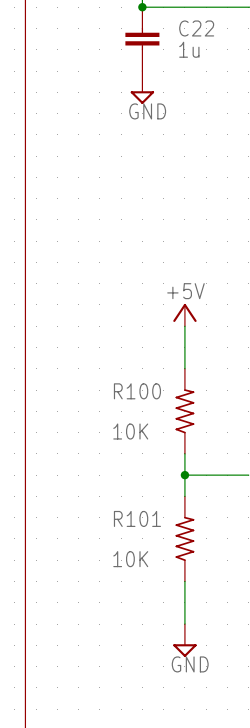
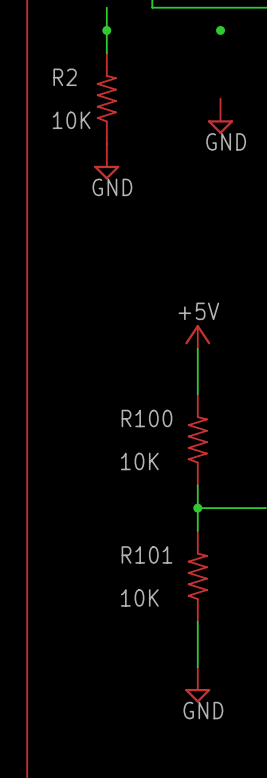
wire: none -> (106, 7) (106, 53)
junction: (142, 7) -> none
junction: none -> (106, 30)
junction: none -> (220, 30)
C22: 1u (142, 39) -> none
power symbol: GND (142, 87) -> none
R2: none -> 10K (106, 98)
power symbol: none -> GND (220, 116)
power symbol: none -> GND (106, 161)

